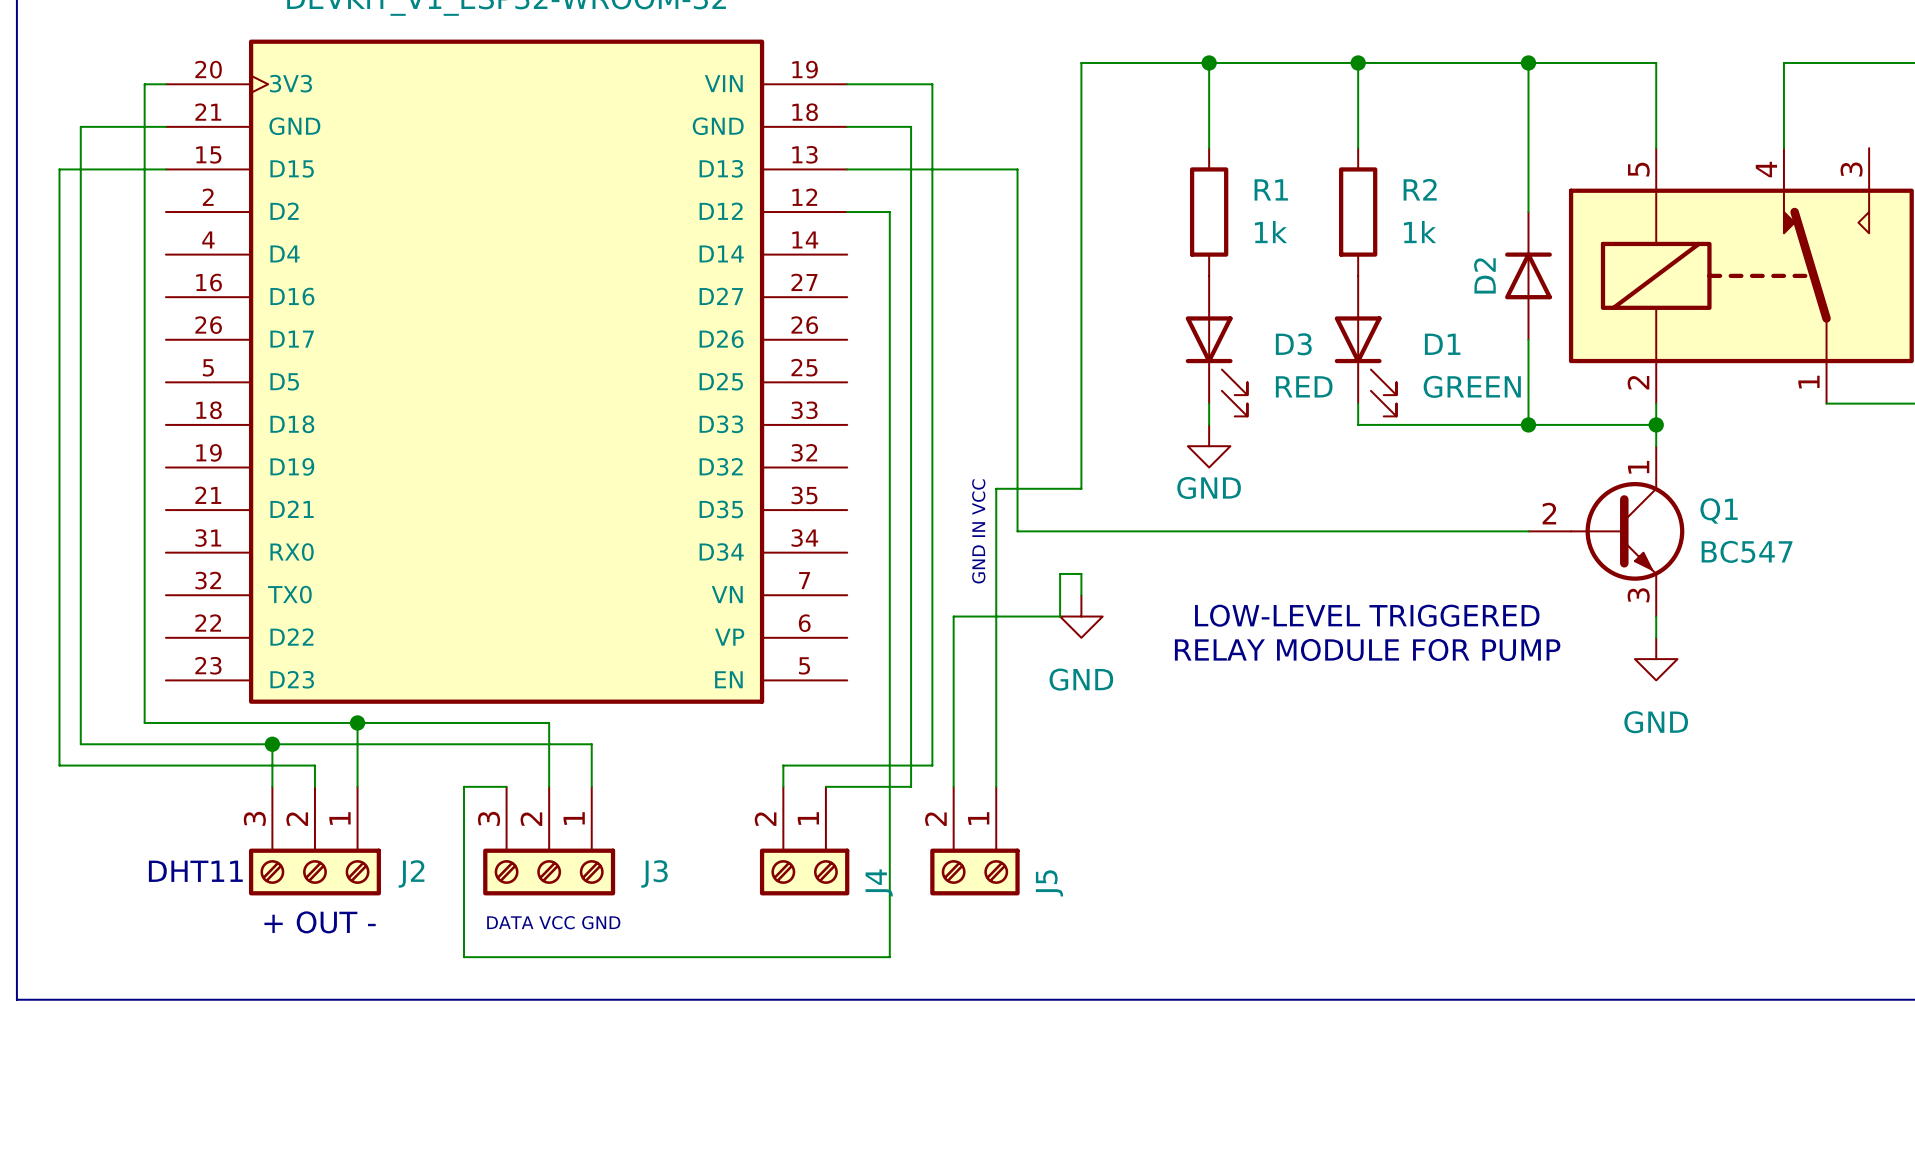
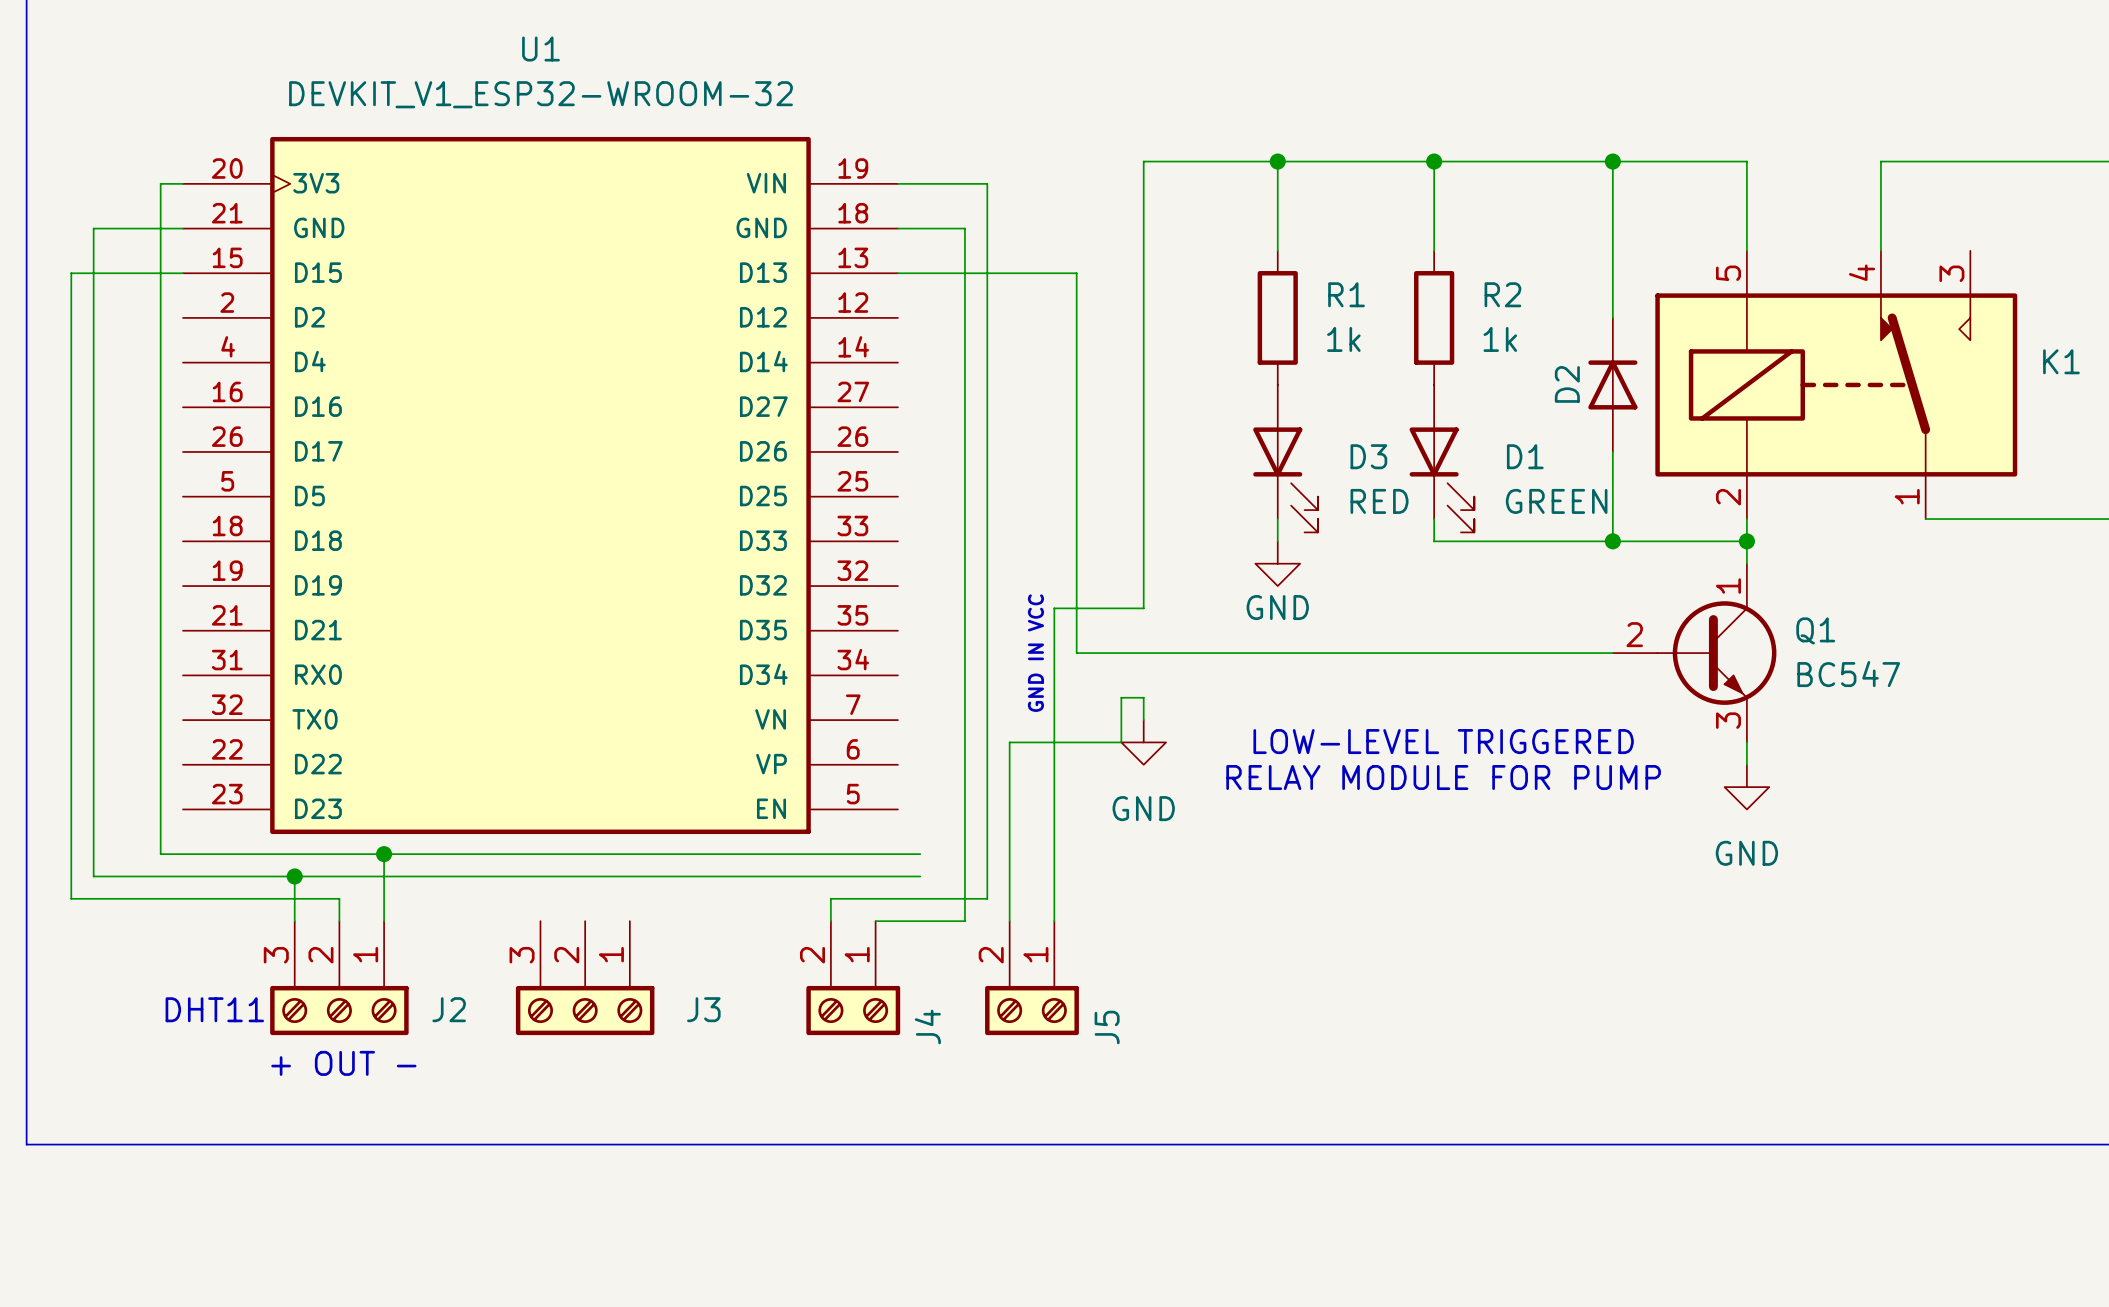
wire: (847, 212) (889, 212) (889, 957) (464, 957) (464, 786) (506, 786) -> none
wire: (549, 722) (549, 786) -> (585, 854) (920, 854)
wire: (591, 744) (591, 786) -> (629, 876) (920, 876)
text: DATA VCC GND (553, 922) -> none

